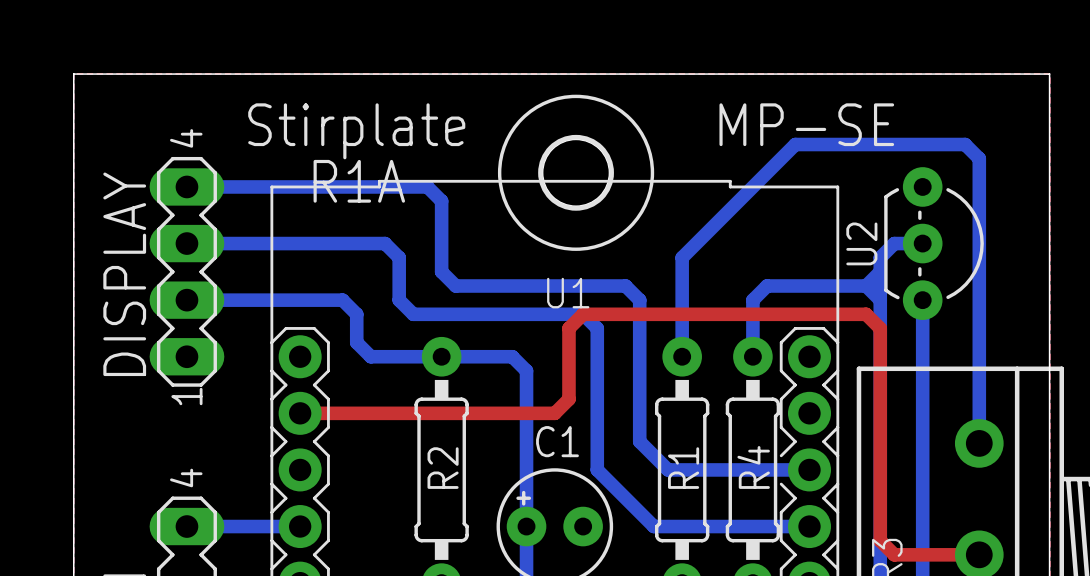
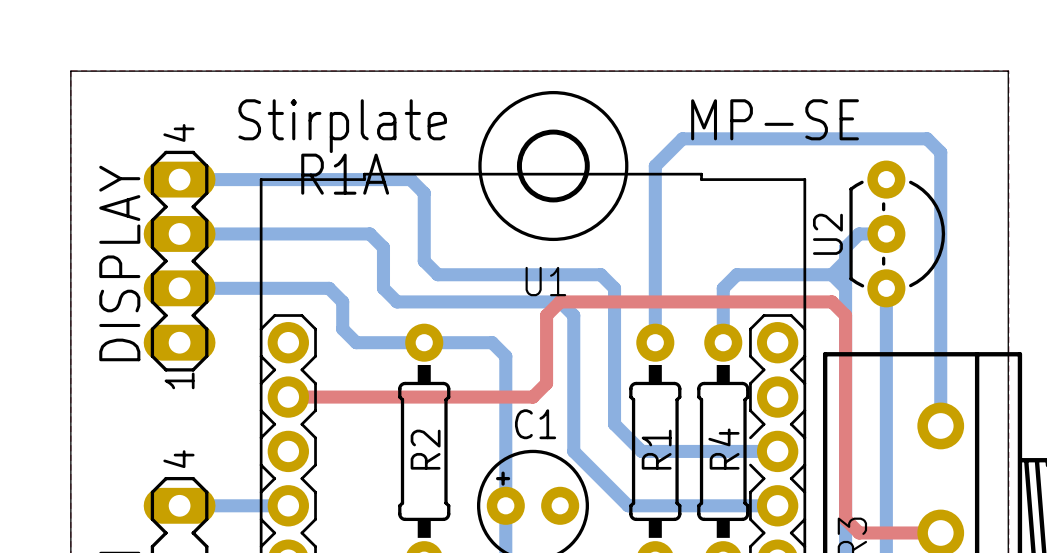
bottom track: (795, 144) (682, 257) -> (764, 138) (682, 138) (655, 166) (655, 247)

